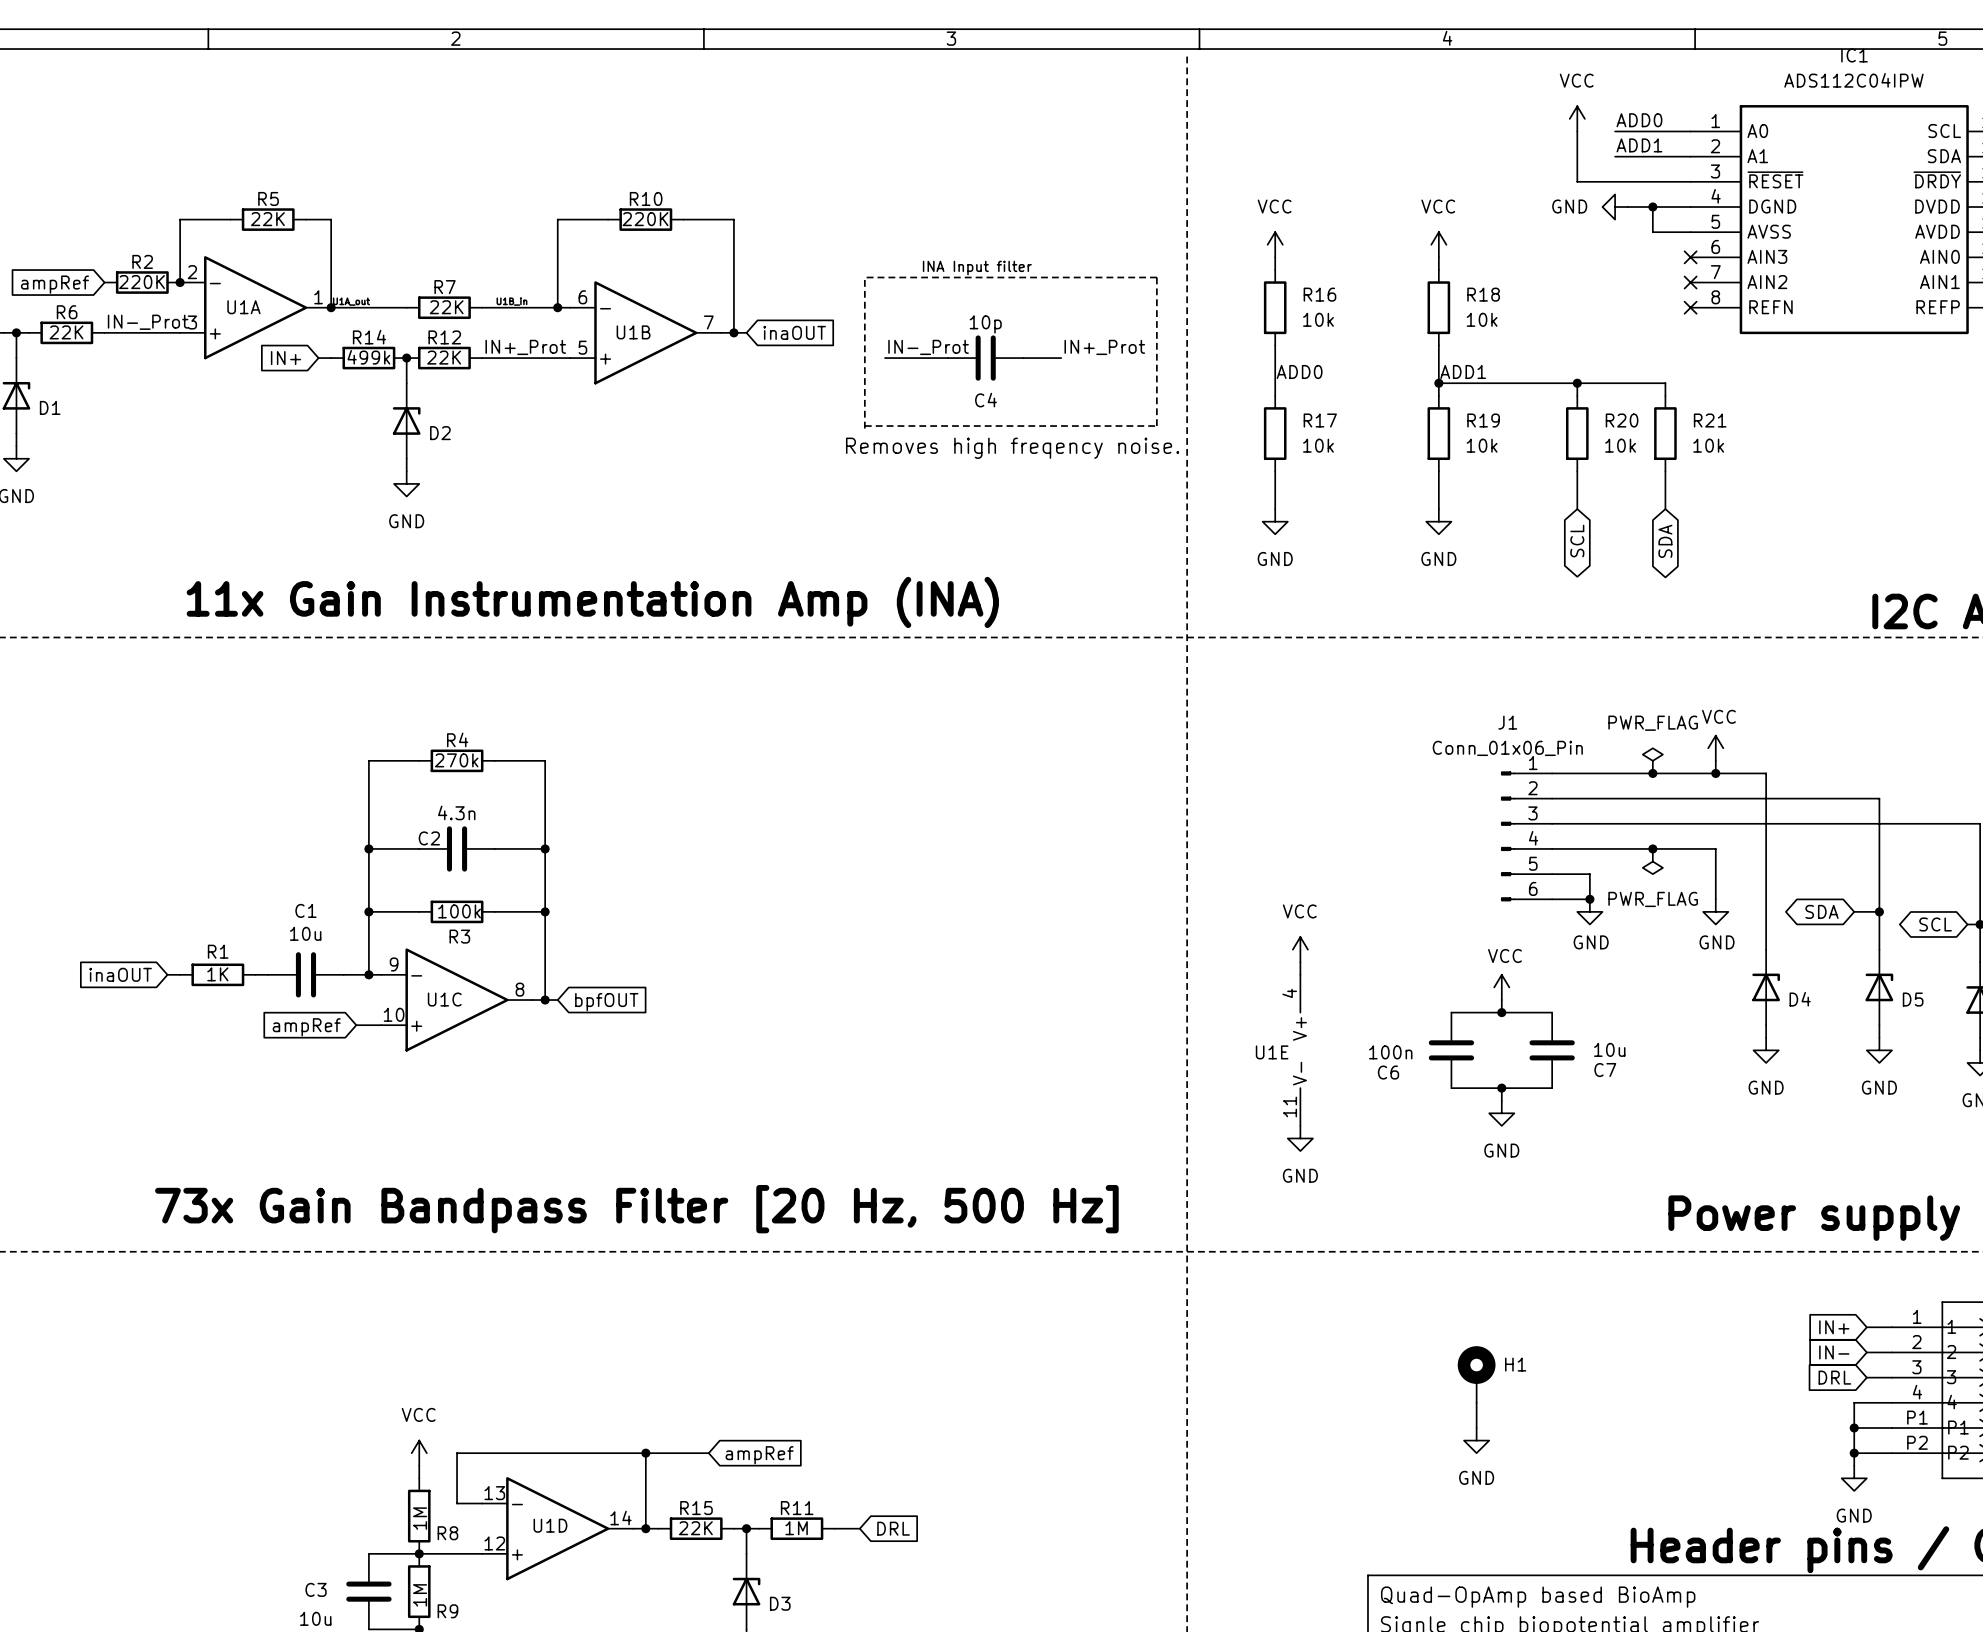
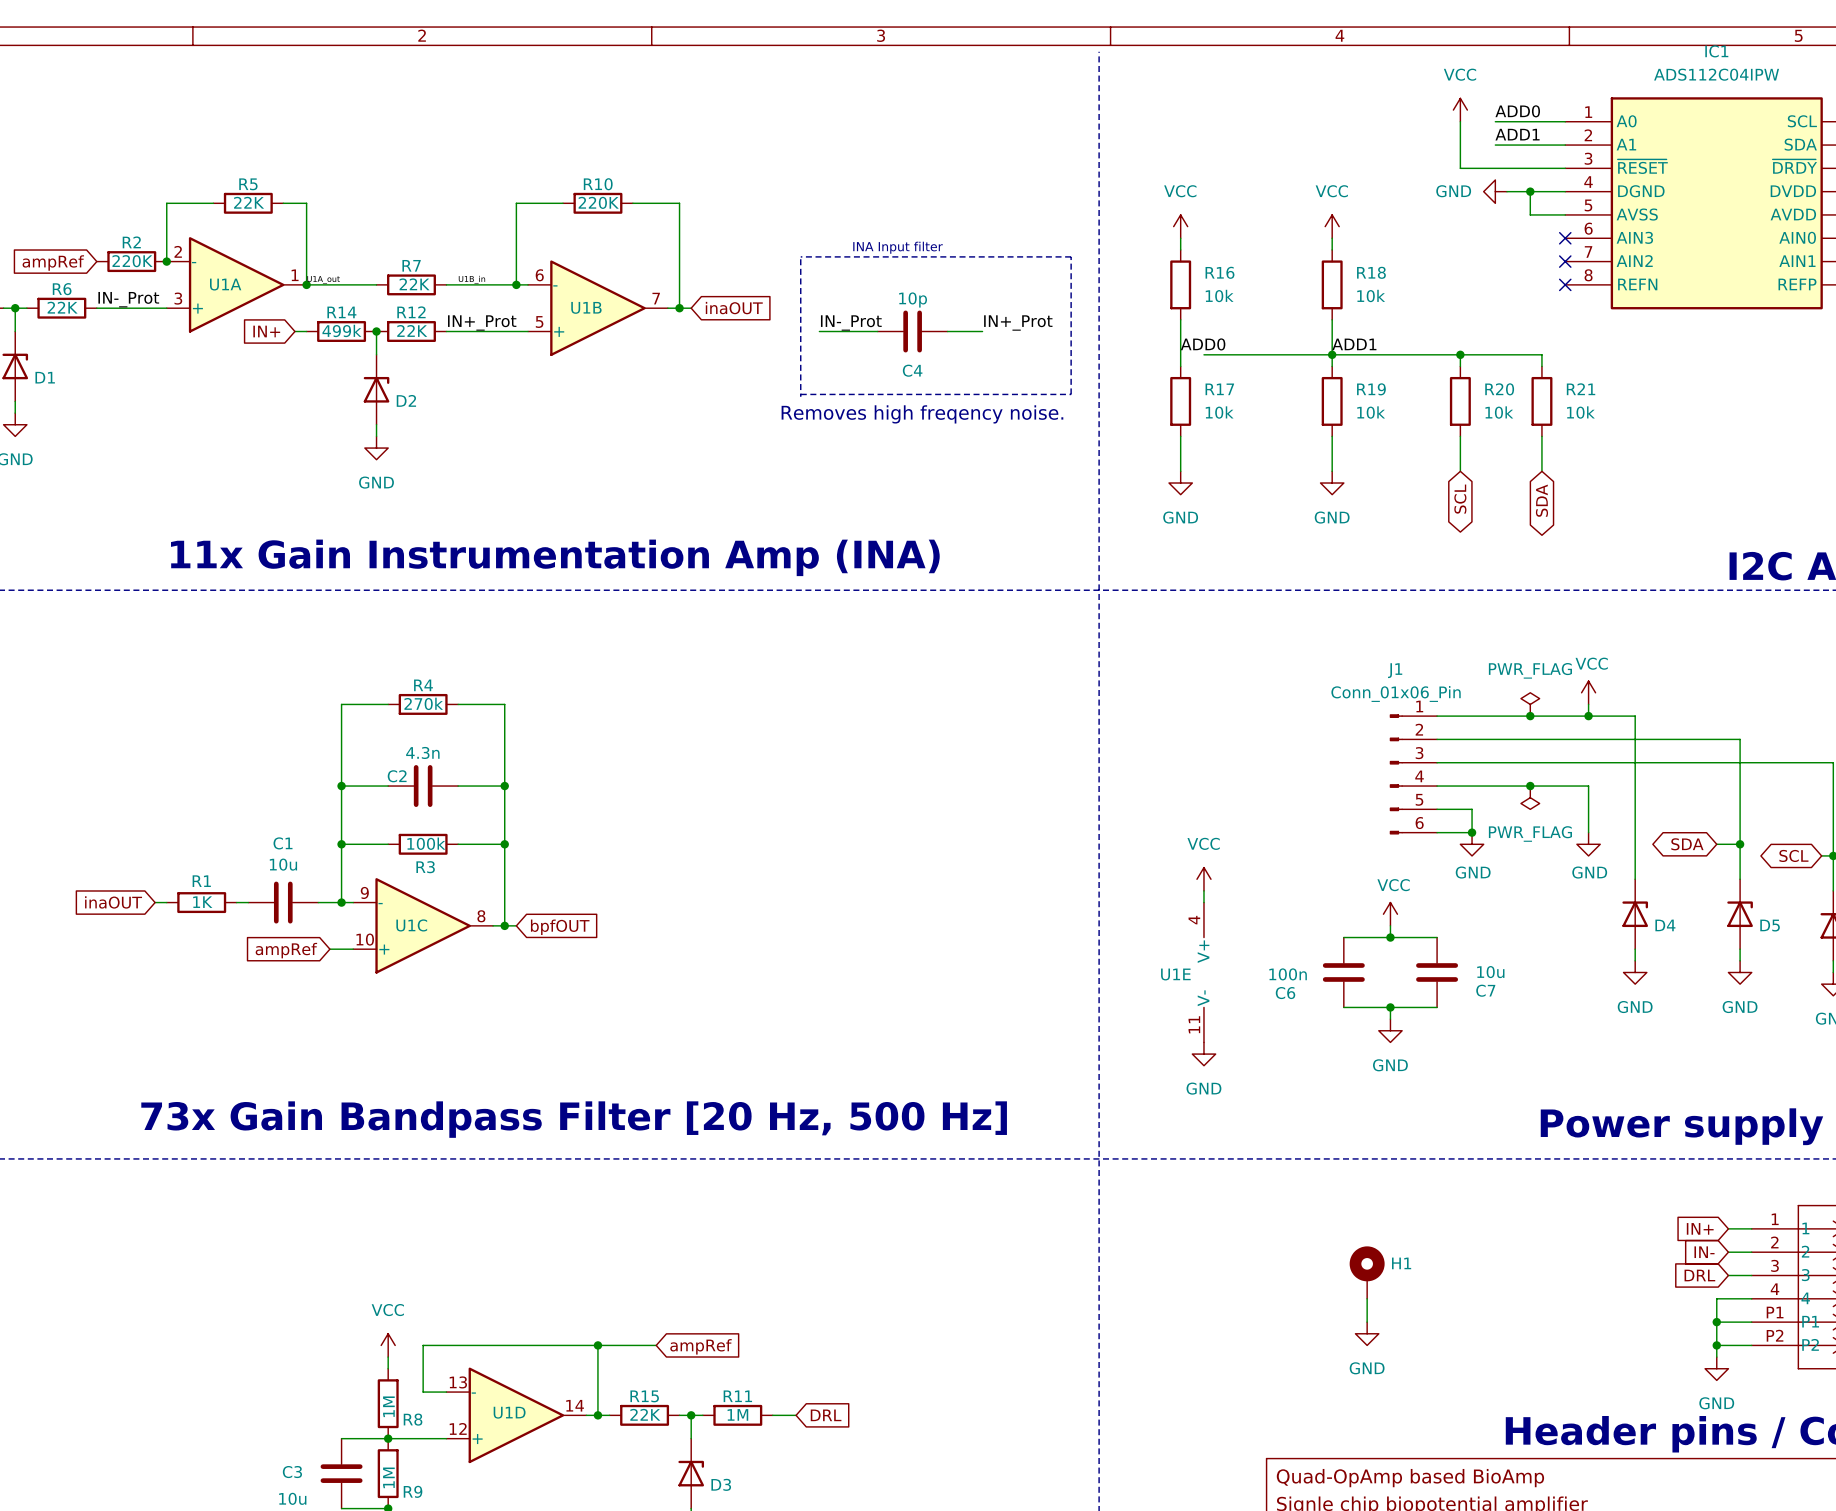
wire: none -> (1203, 354) (1332, 354)

